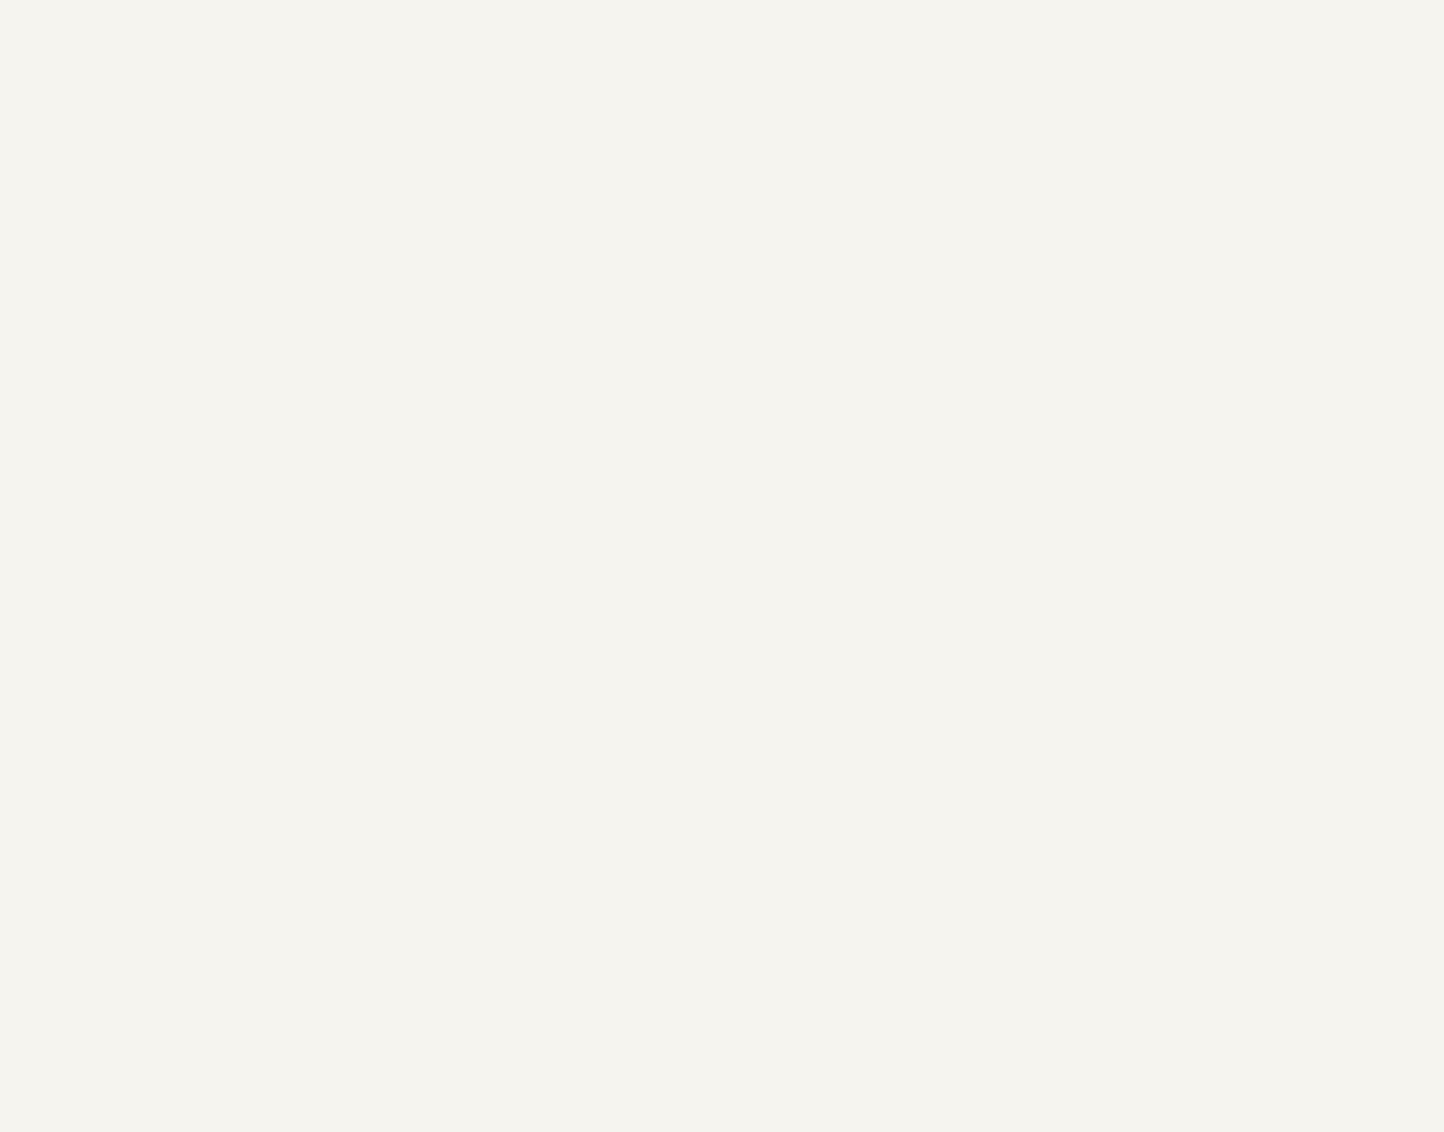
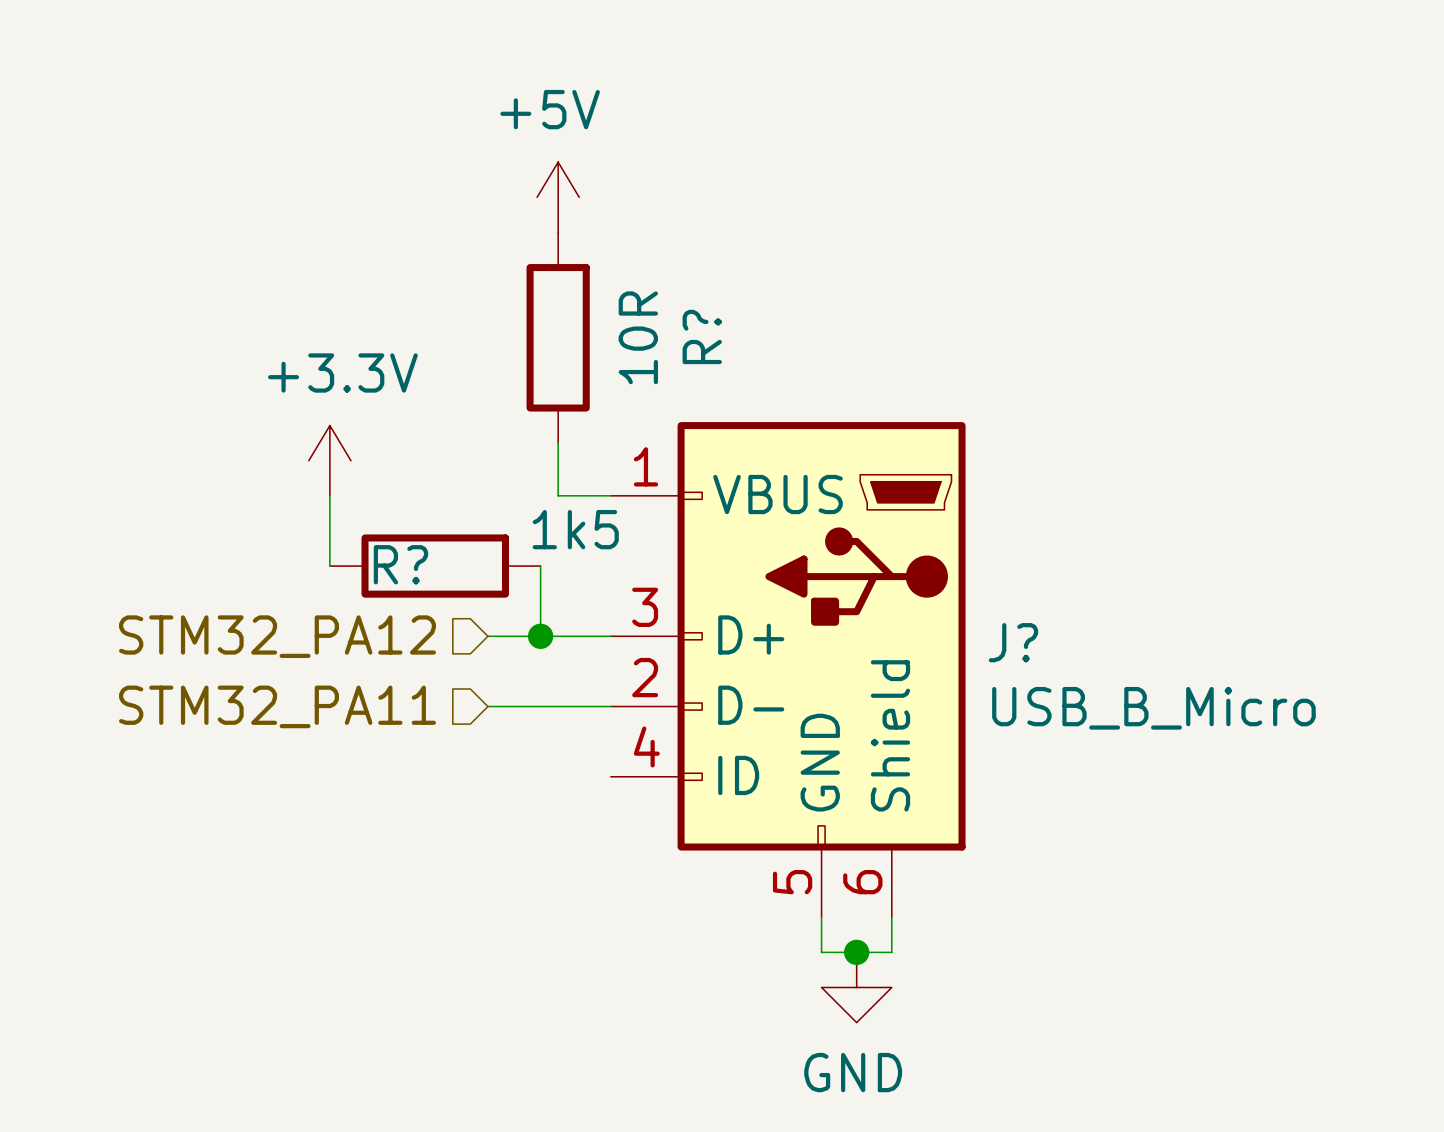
power symbol: none -> +5V (558, 197)
R?: none -> 10R (558, 337)
wire: none -> (558, 443) (558, 495) (610, 495)
power symbol: none -> +3.3V (329, 460)
wire: none -> (329, 495) (329, 566)
R?: none -> 1k5 (435, 566)
wire: none -> (540, 566) (540, 636)
wire: none -> (487, 636) (610, 636)
junction: none -> (540, 636)
hierarchical label: none -> STM32_PA12 (277, 636)
J?: none -> USB_B_Micro (788, 669)
wire: none -> (487, 706) (610, 706)
hierarchical label: none -> STM32_PA11 (277, 706)
wire: none -> (821, 917) (821, 952) (891, 952) (891, 917)
junction: none -> (856, 952)
power symbol: none -> GND (856, 987)

